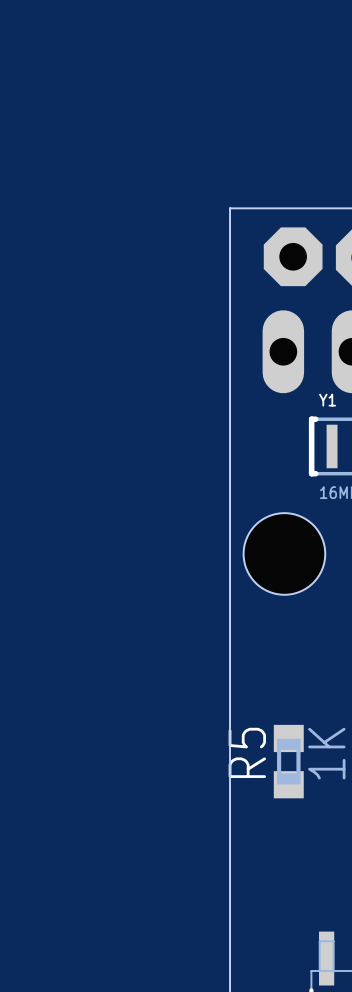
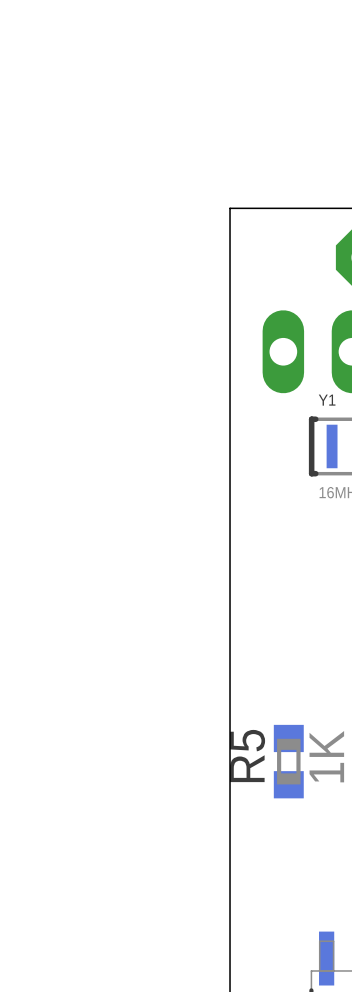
part: (293, 256) -> none
hole: (284, 553) -> none

